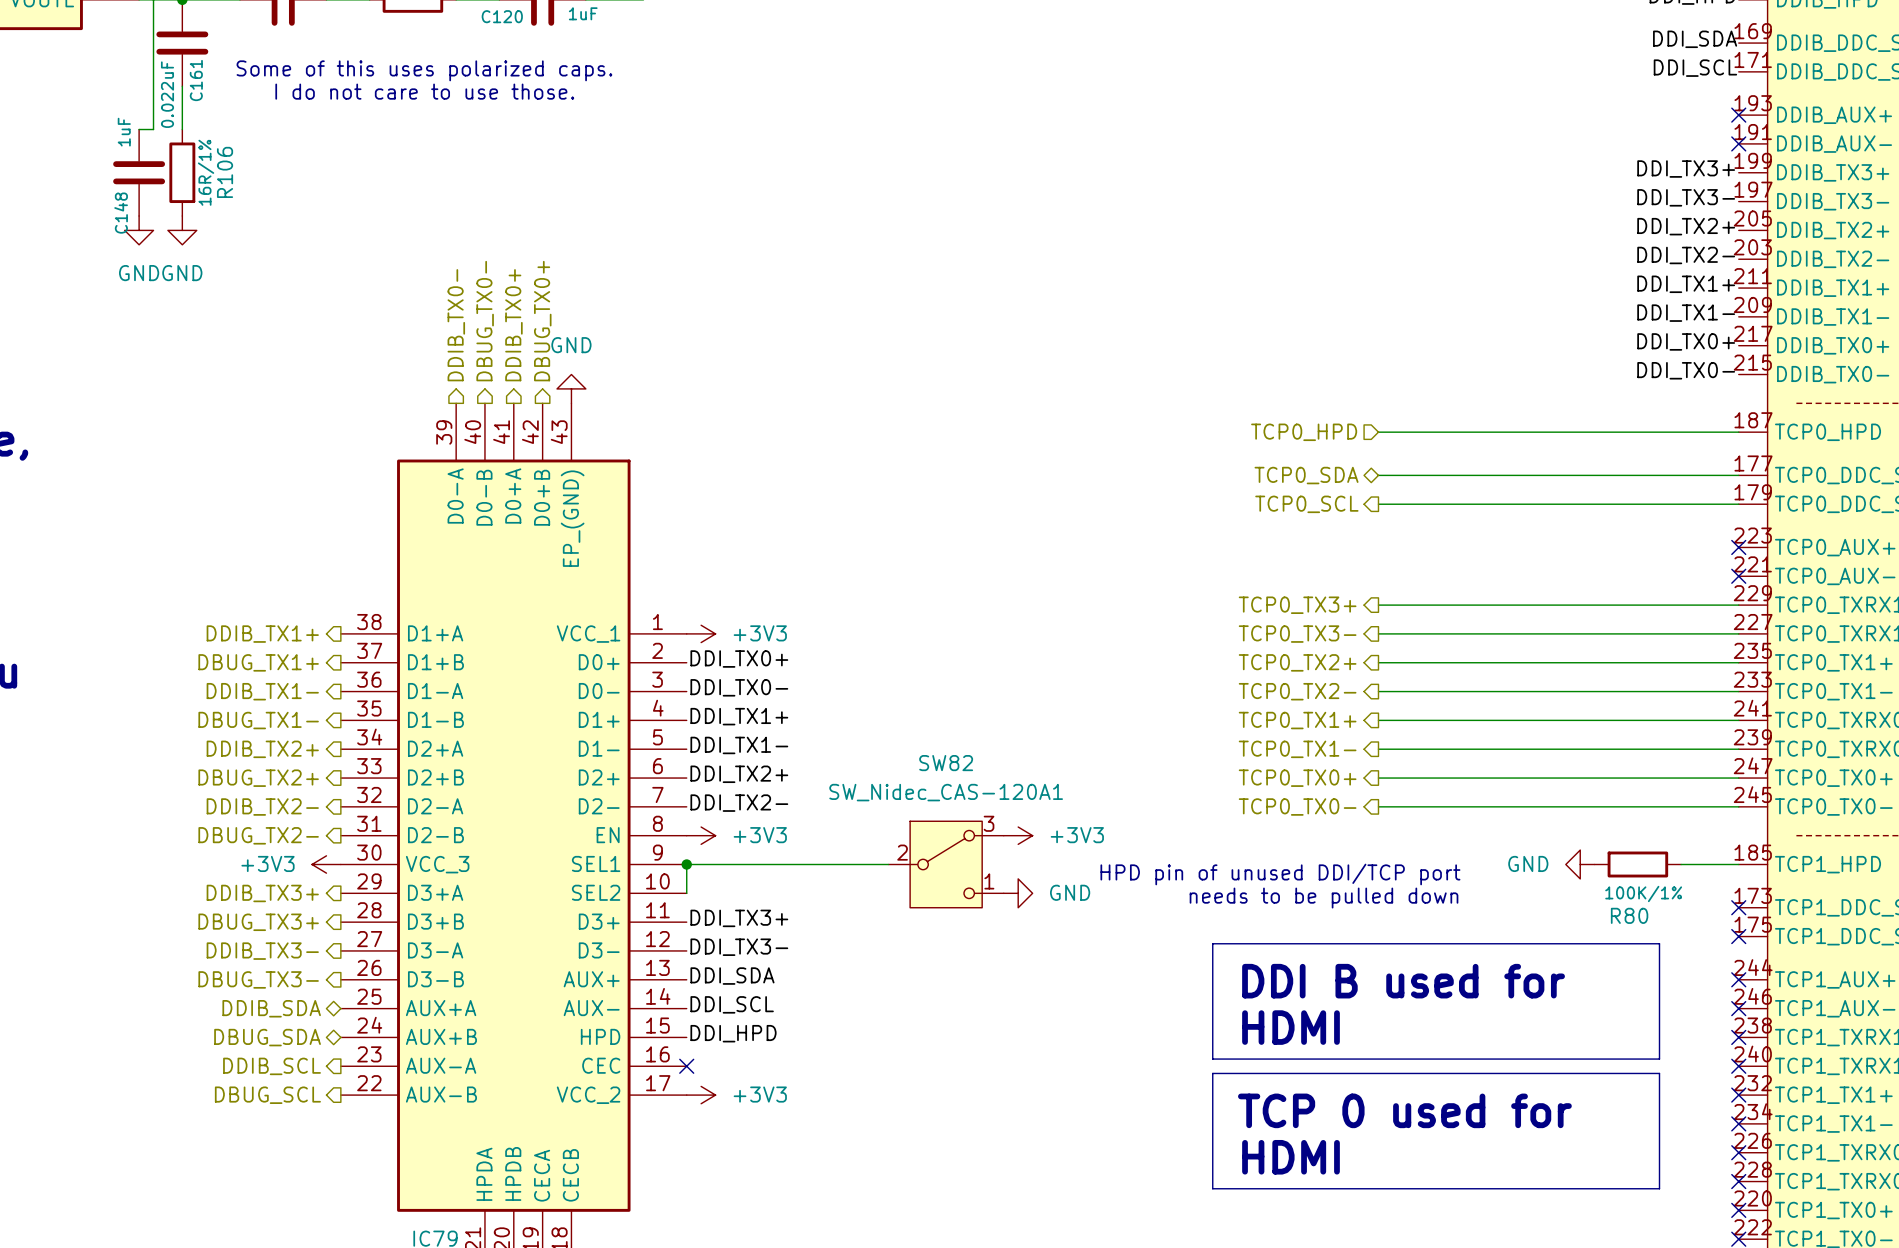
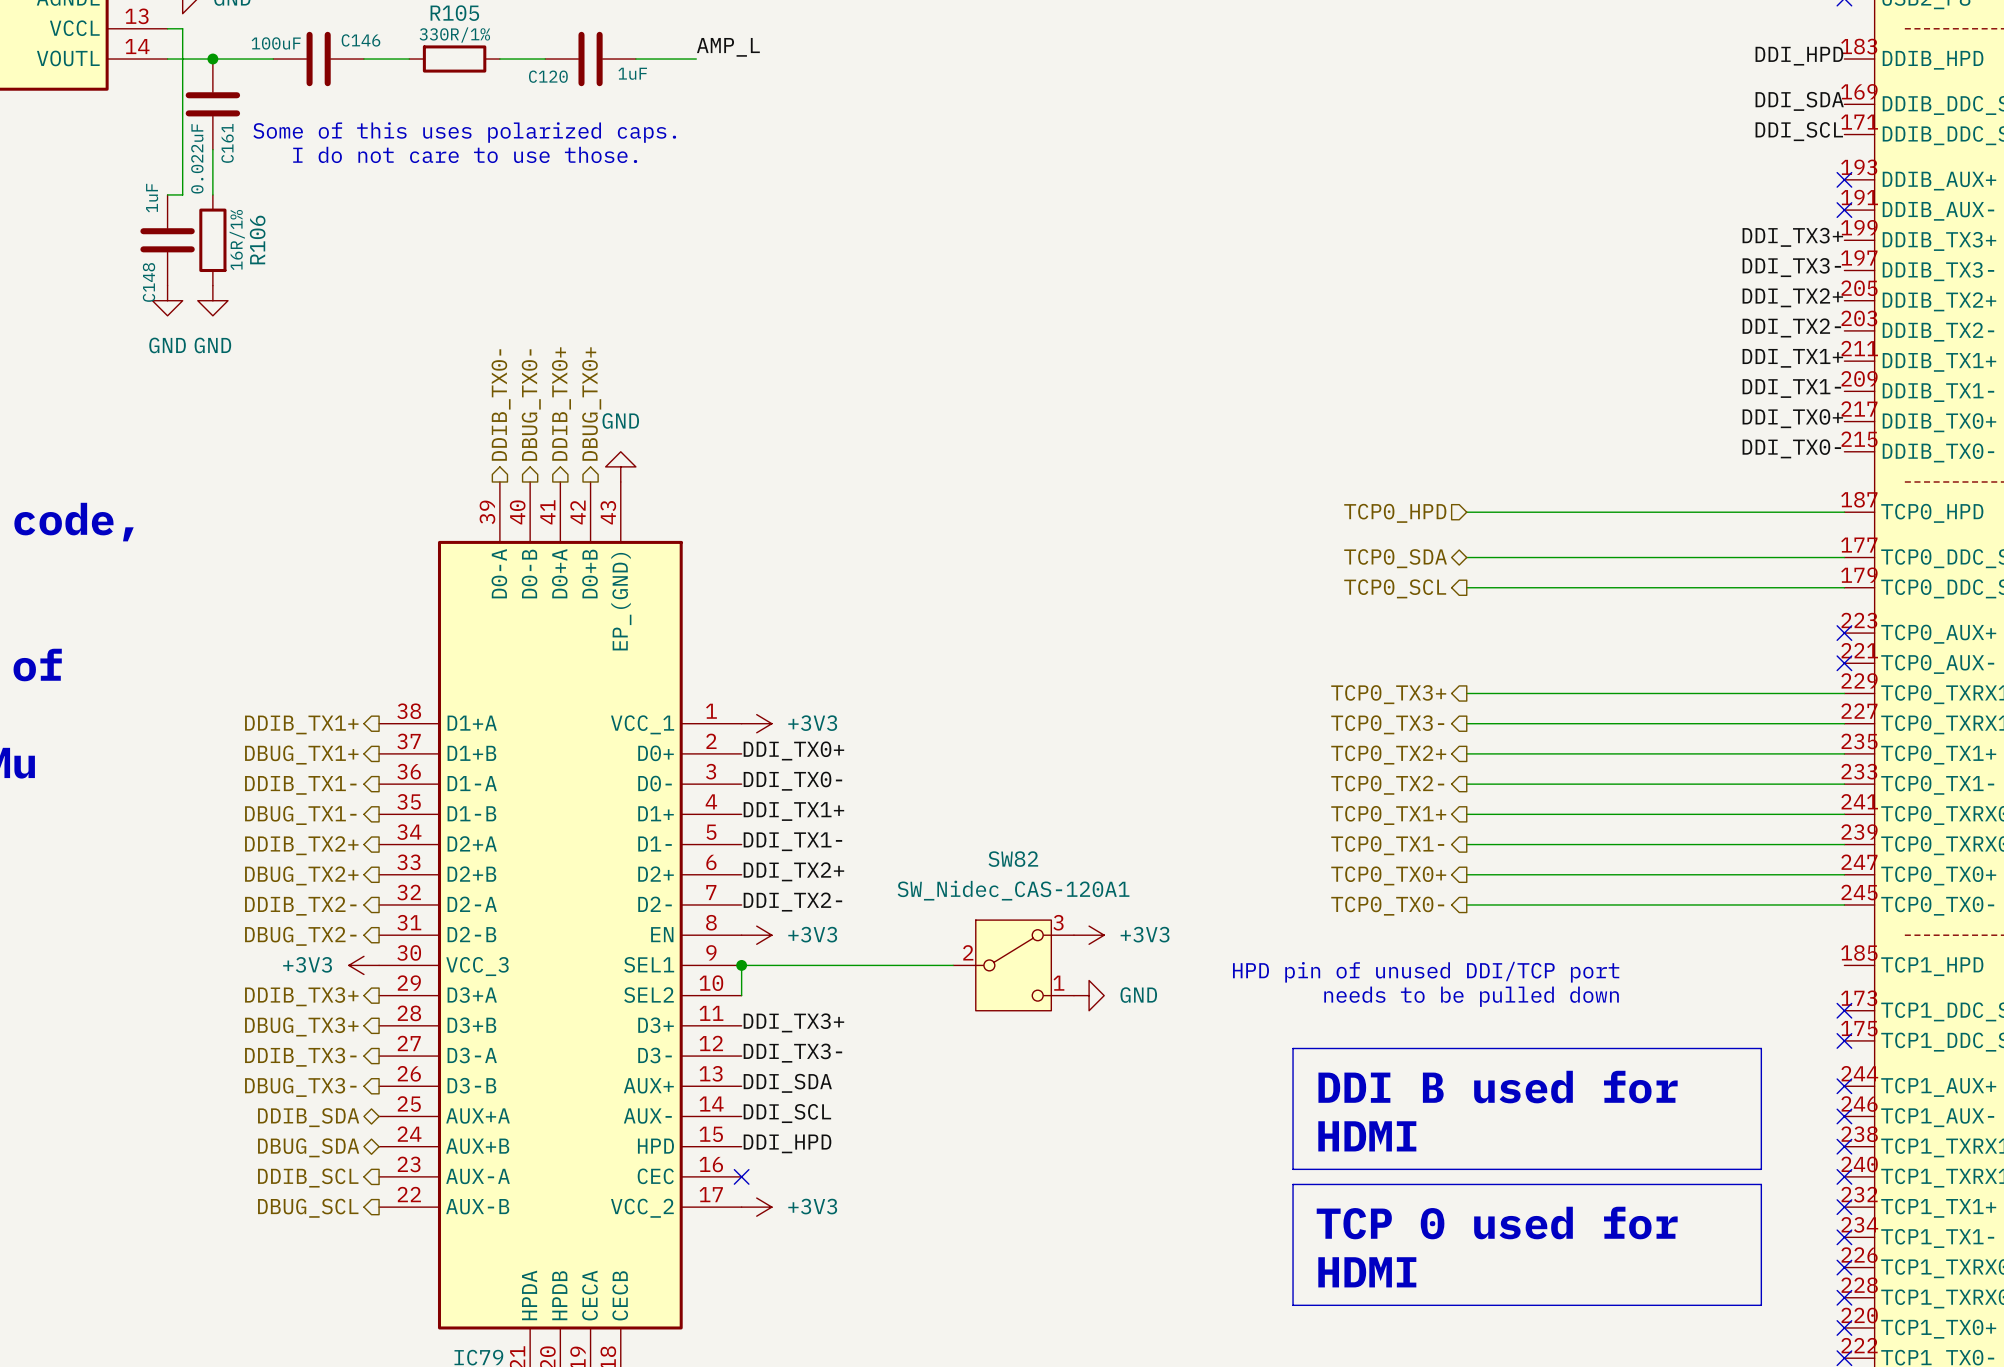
power symbol: GND (1580, 864) -> none
R80: 100K/1% (1637, 864) -> none
wire: (1681, 864) (1738, 864) -> none
text position: HPD pin of unused DDI/TCP port (1280, 874) -> HPD pin of unused DDI/TCP port (1426, 972)
text position: needs to be pulled down (1324, 898) -> needs to be pulled down (1471, 996)

